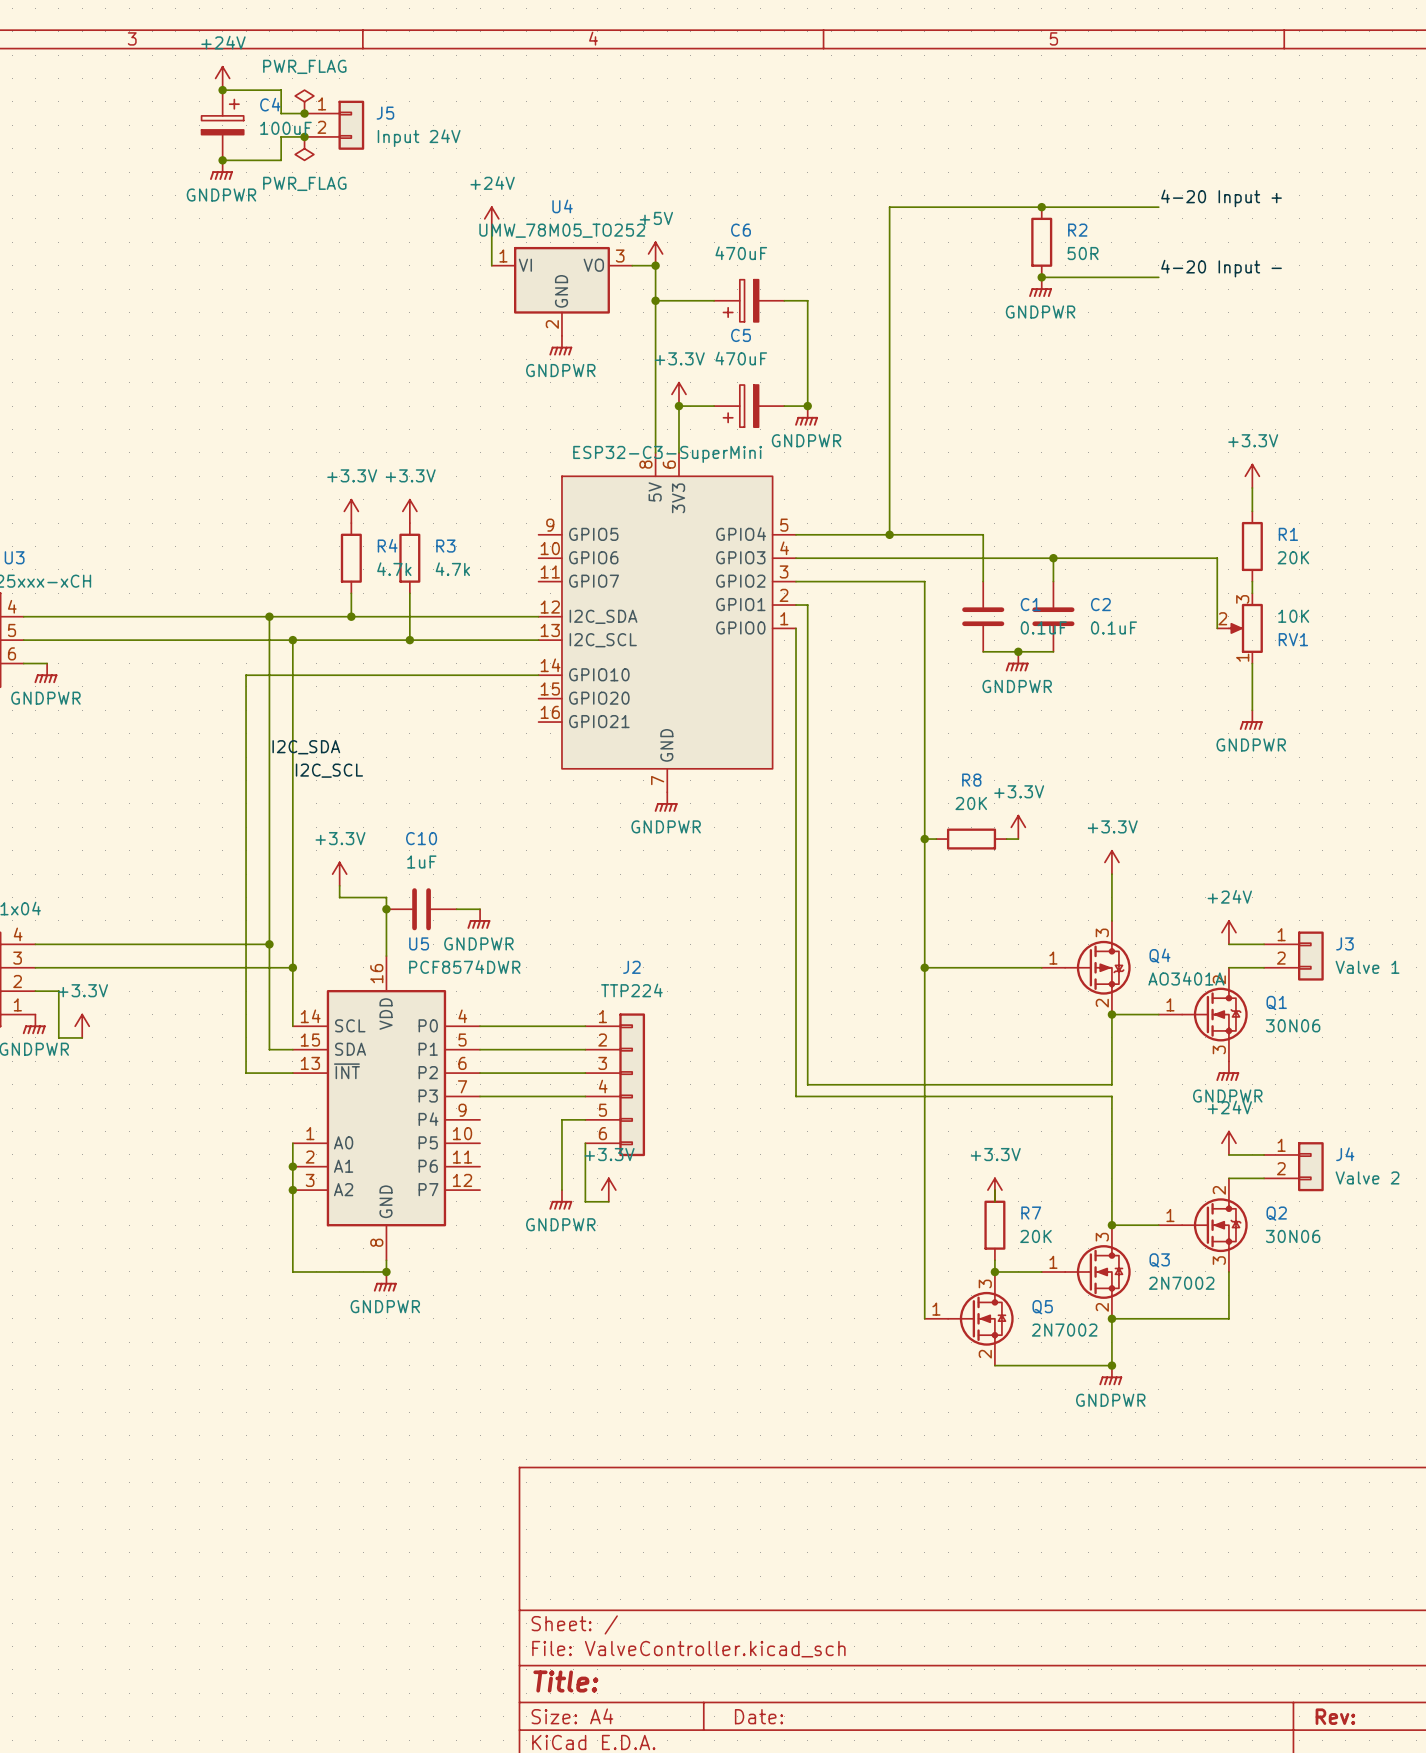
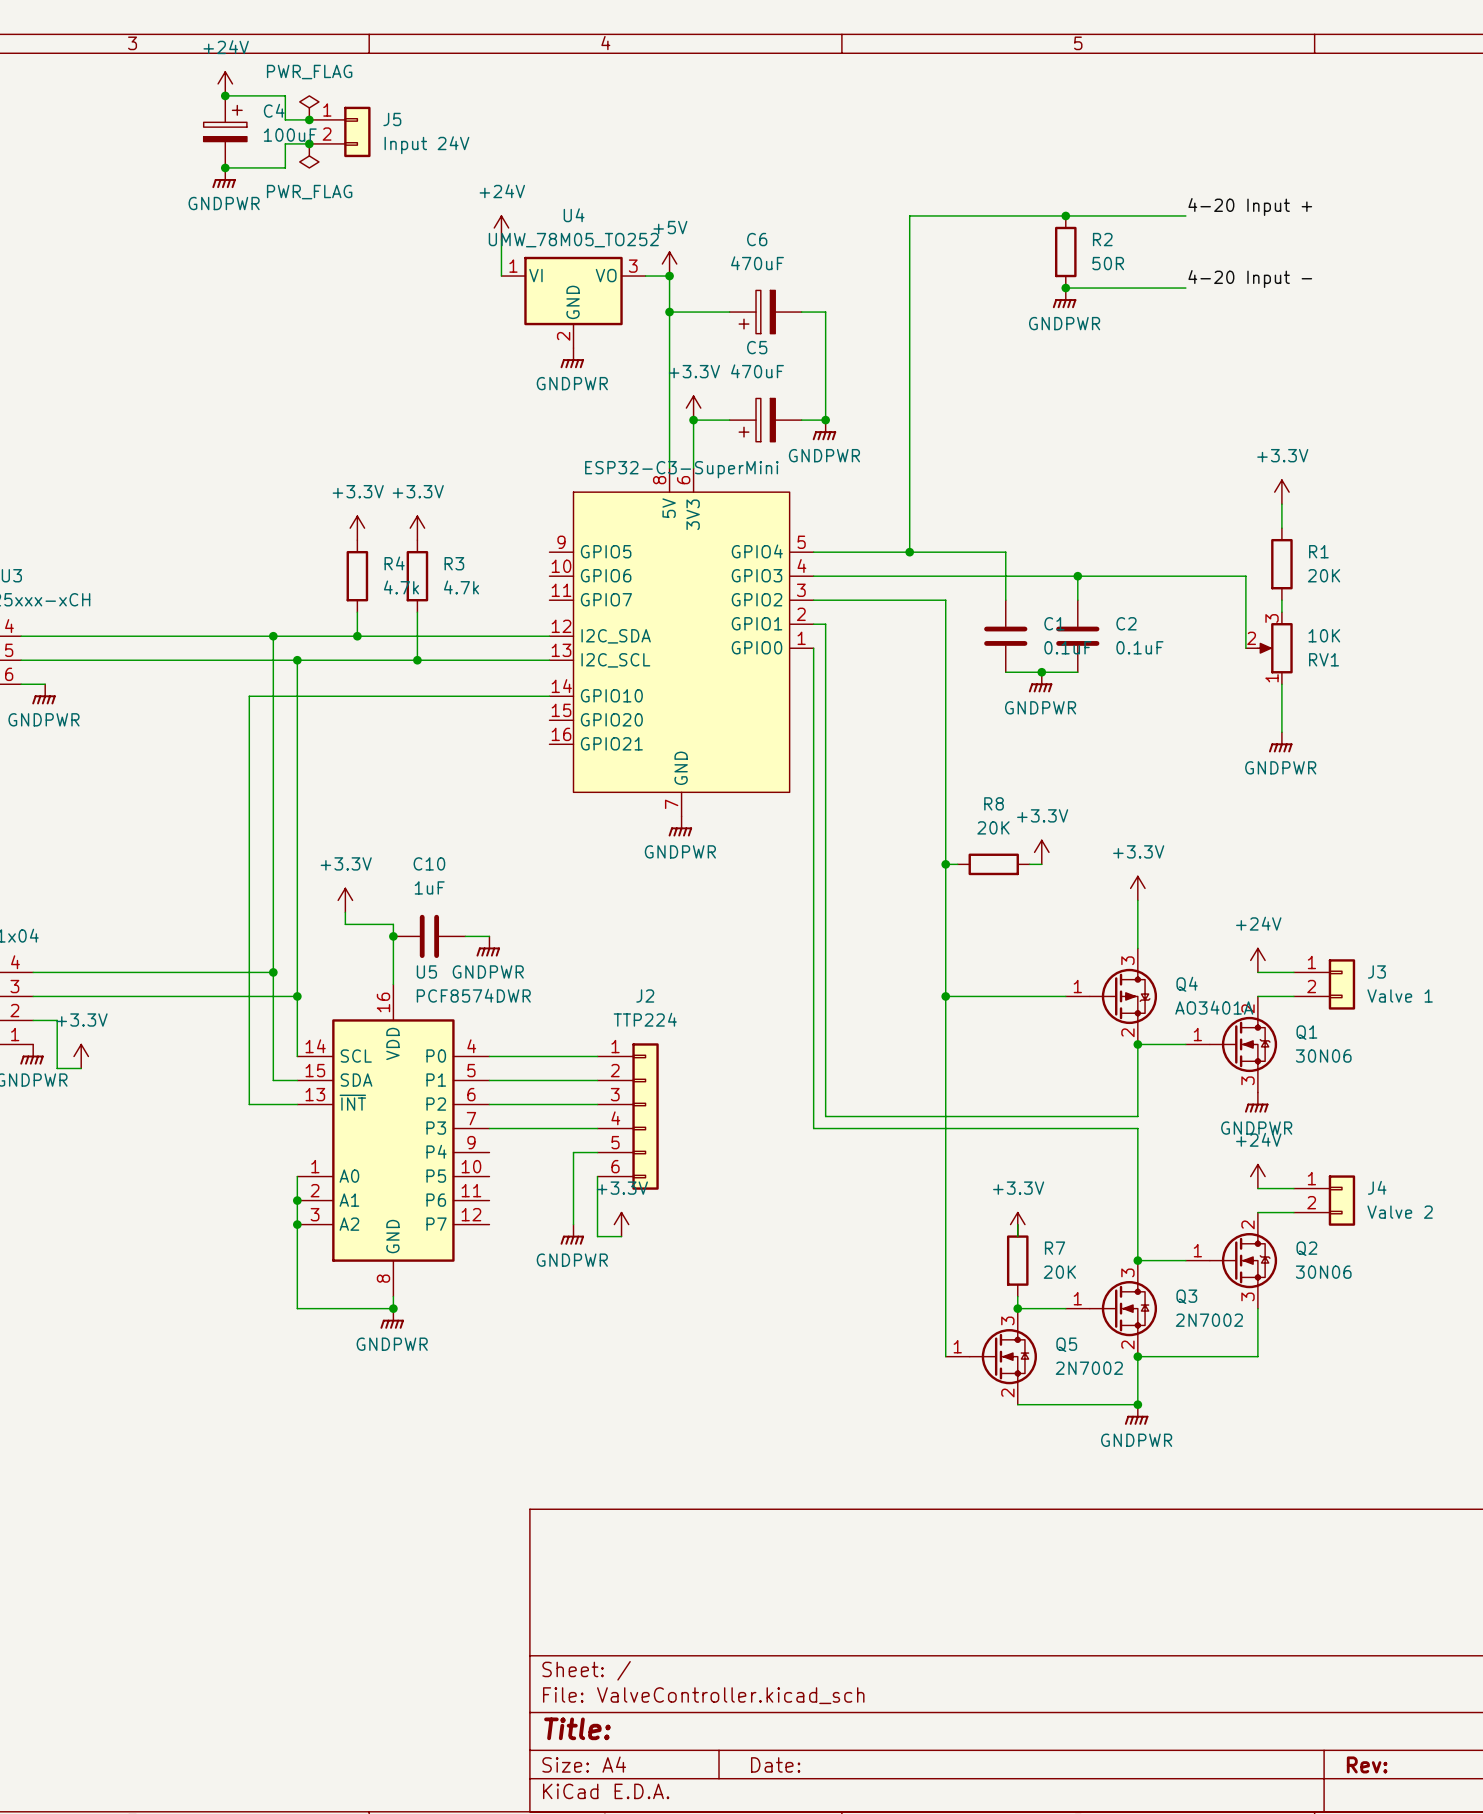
label: I2C_SDA (306, 747) -> none
label: I2C_SCL (329, 770) -> none

